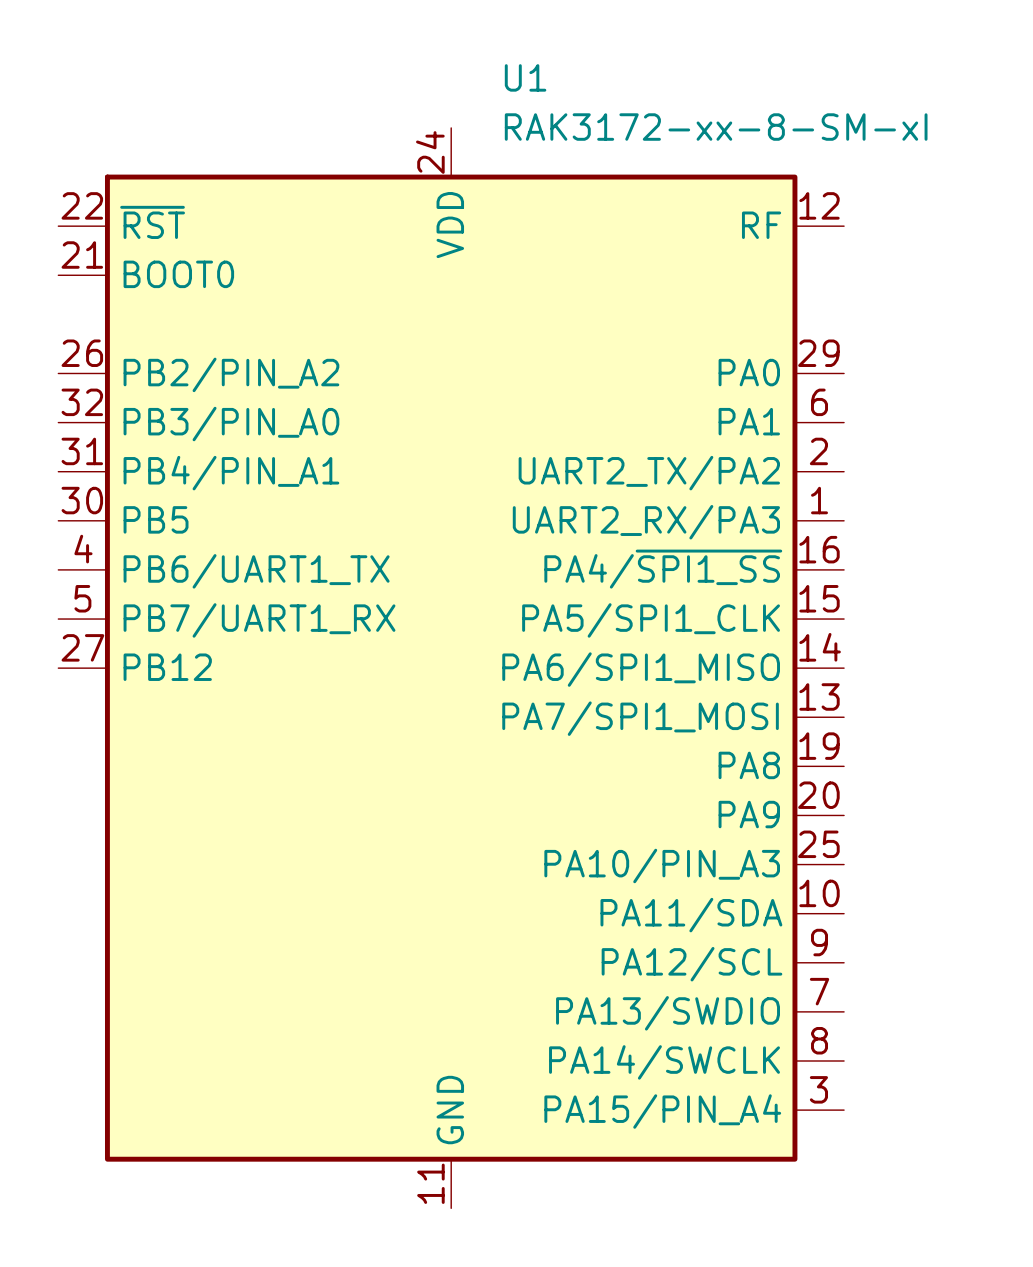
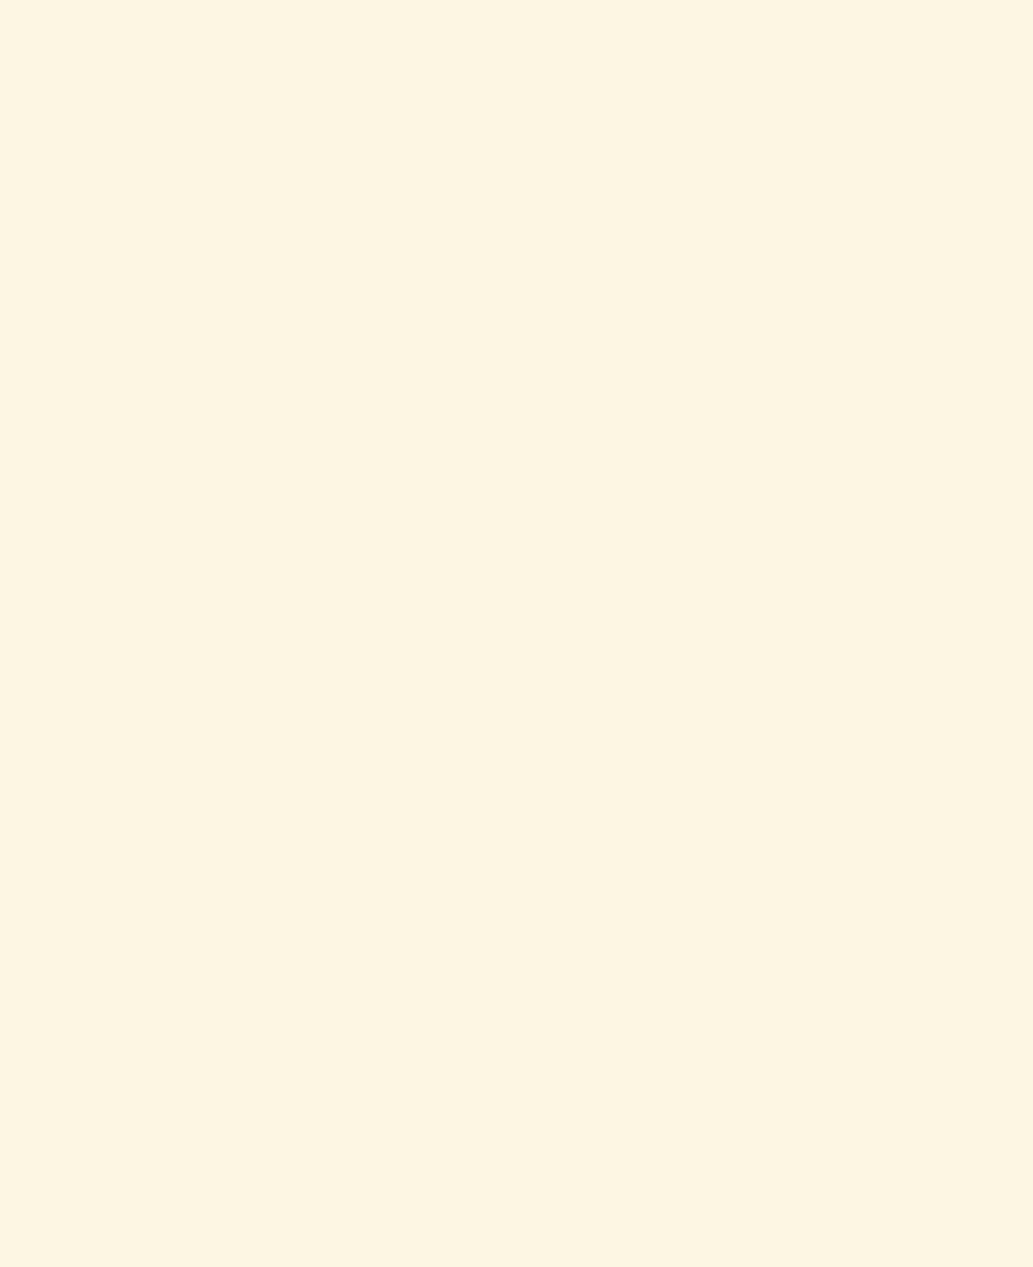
U1: RAK3172-xx-8-SM-xI (451, 668) -> none

